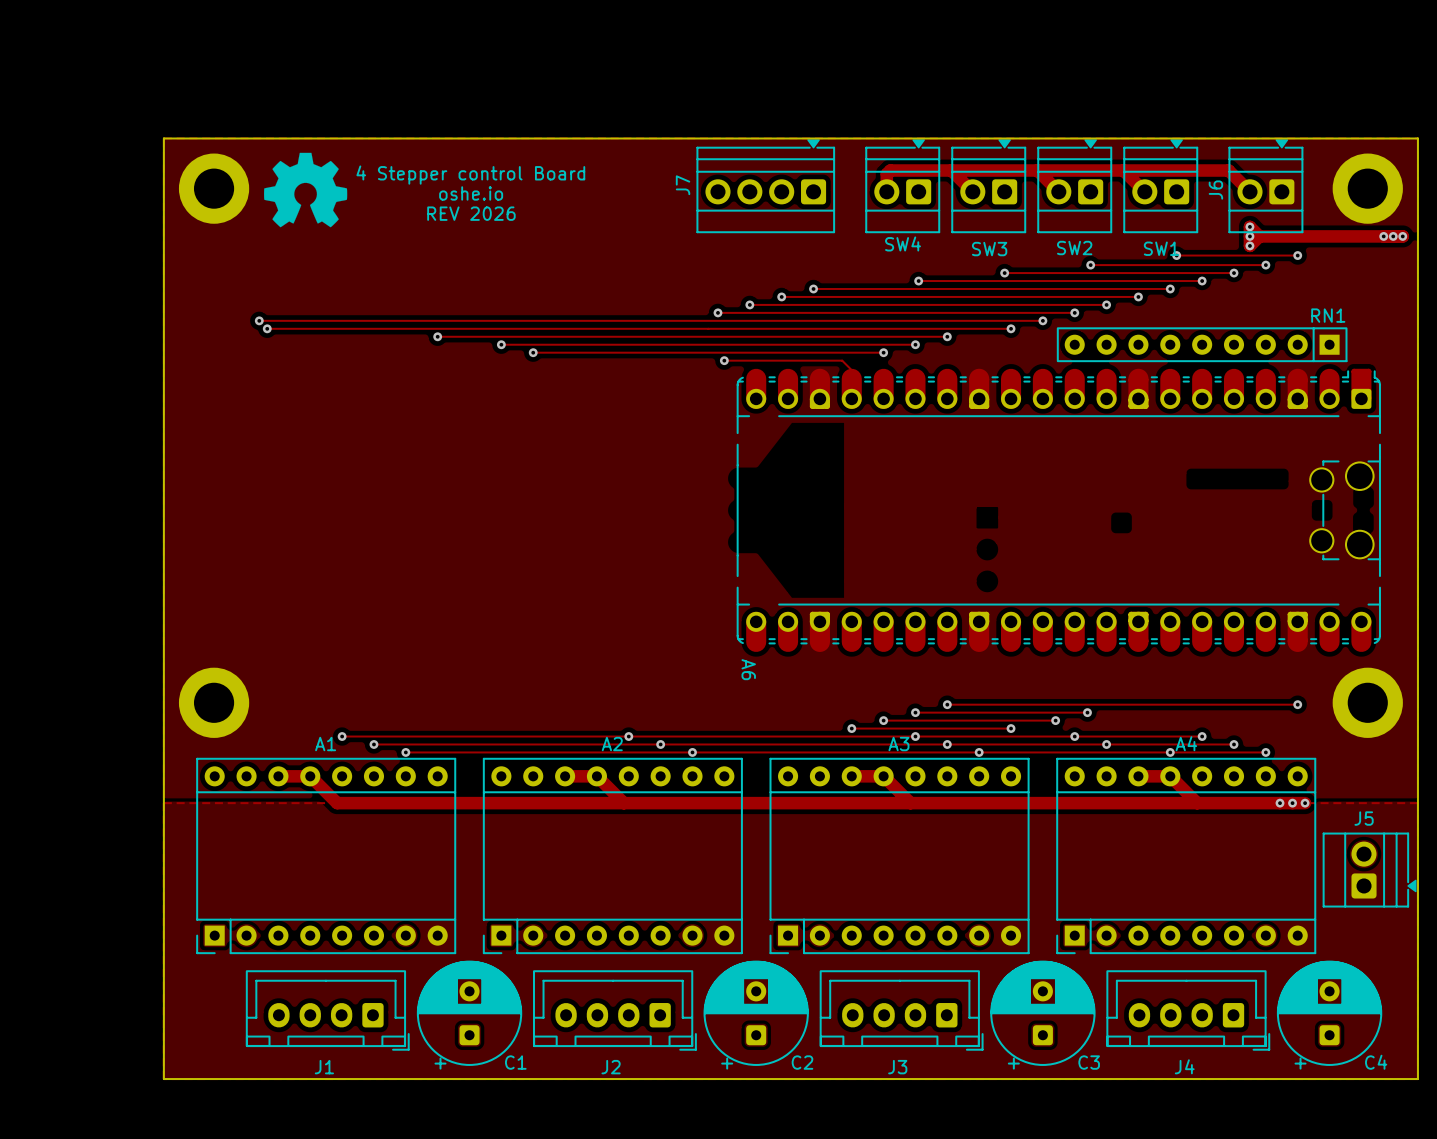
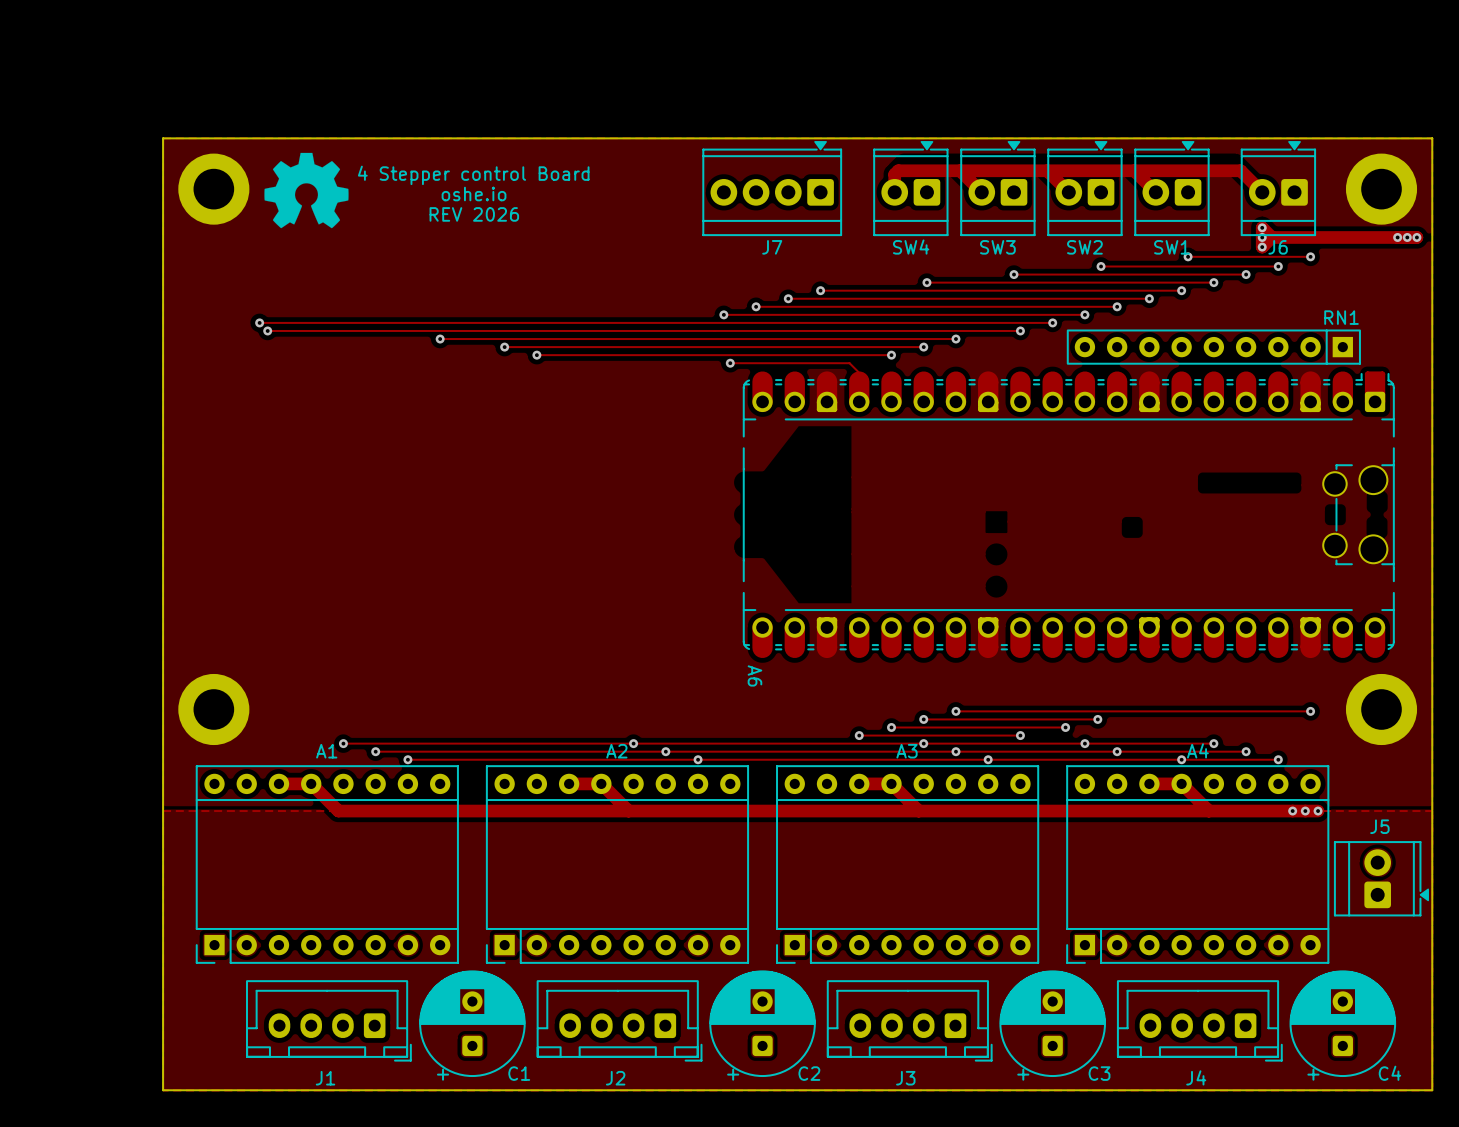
J7 footprint: [696, 139, 835, 233] -> [702, 141, 842, 236]
SW4 footprint: [865, 139, 940, 233] -> [873, 141, 949, 236]
SW3 footprint: [951, 139, 1026, 233] -> [960, 141, 1036, 236]
SW2 footprint: [1037, 139, 1112, 233] -> [1047, 141, 1123, 236]
SW1 footprint: [1123, 139, 1198, 233] -> [1134, 141, 1210, 236]
J6 footprint: [1228, 139, 1304, 233] -> [1240, 141, 1316, 236]
J7 name position: J7 (683, 185) -> J7 (772, 247)
J6 name position: J6 (1215, 190) -> J6 (1278, 247)
J5 footprint: [1322, 832, 1417, 908] -> [1334, 841, 1429, 917]

